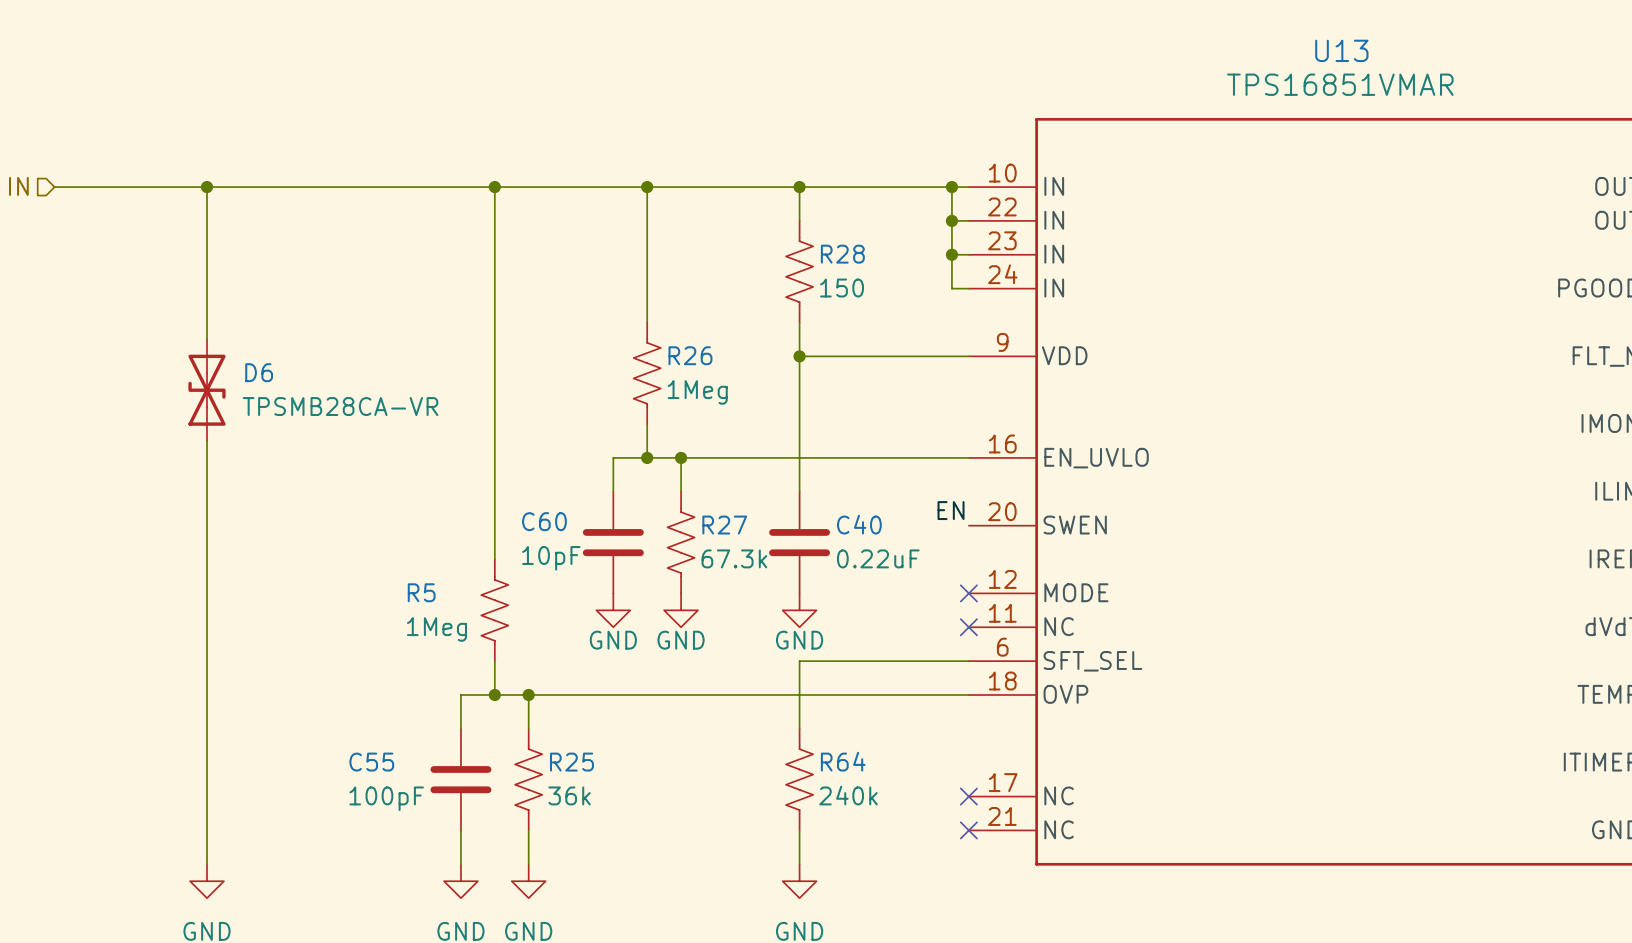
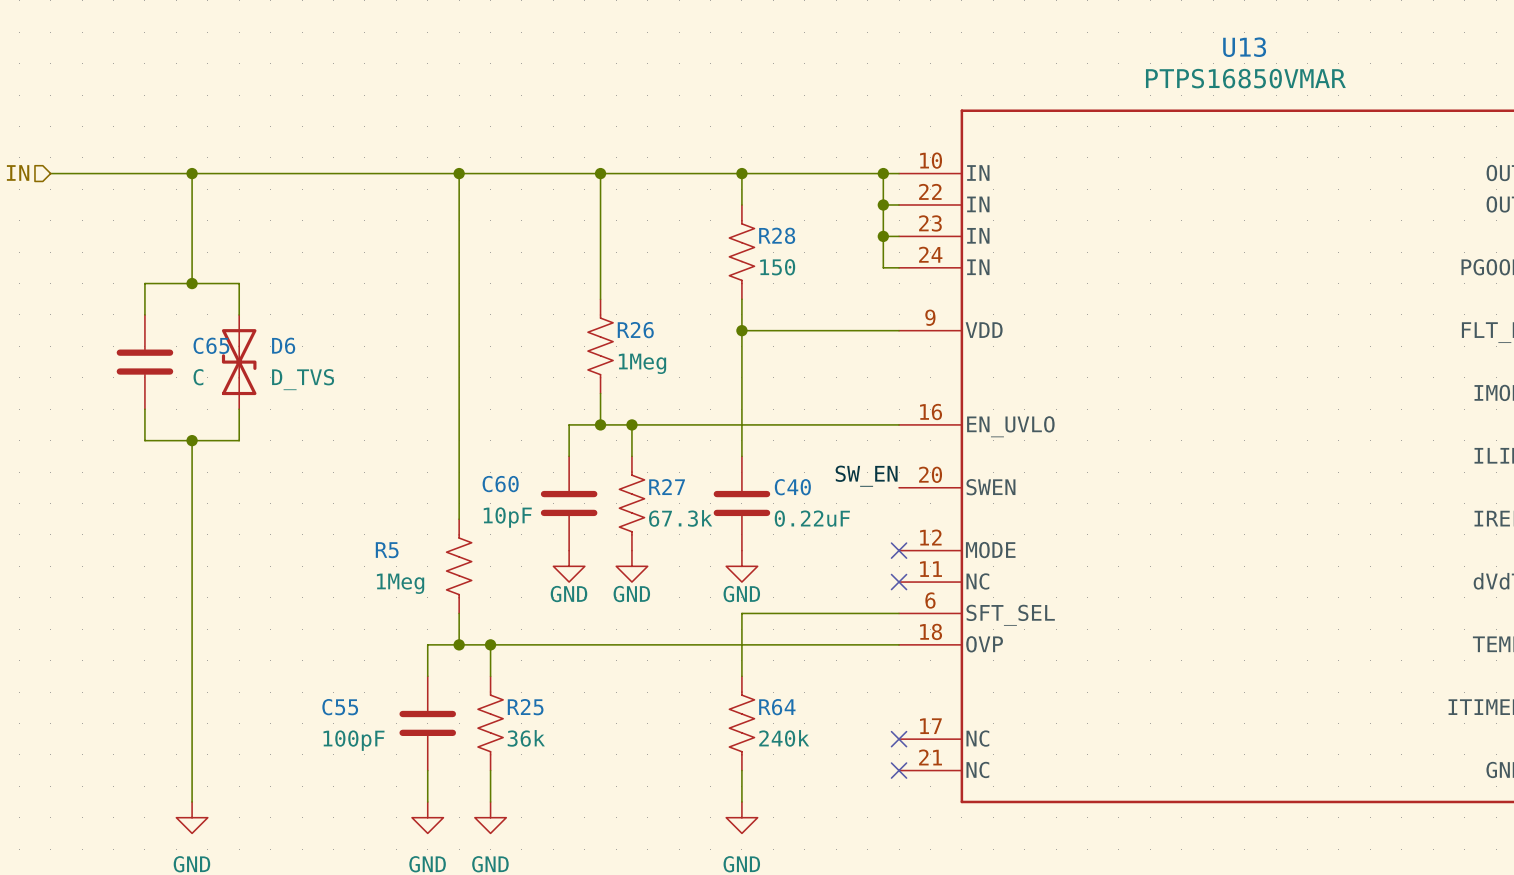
U13 value: TPS16851VMAR (1340, 84) -> PTPS16850VMAR (1245, 78)
wire: (207, 305) (207, 339) -> none
junction: none -> (192, 283)
wire: none -> (144, 314) (144, 283) (239, 283) (239, 314)
C65: none -> C (144, 362)
D6 position: (207, 390) -> (239, 362)
D6 value: TPSMB28CA-VR (340, 406) -> D_TVS (303, 379)
wire: none -> (144, 409) (144, 440) (239, 440) (239, 409)
wire: (207, 441) (207, 474) -> none
junction: none -> (192, 440)
label: EN (951, 510) -> SW_EN (866, 476)

